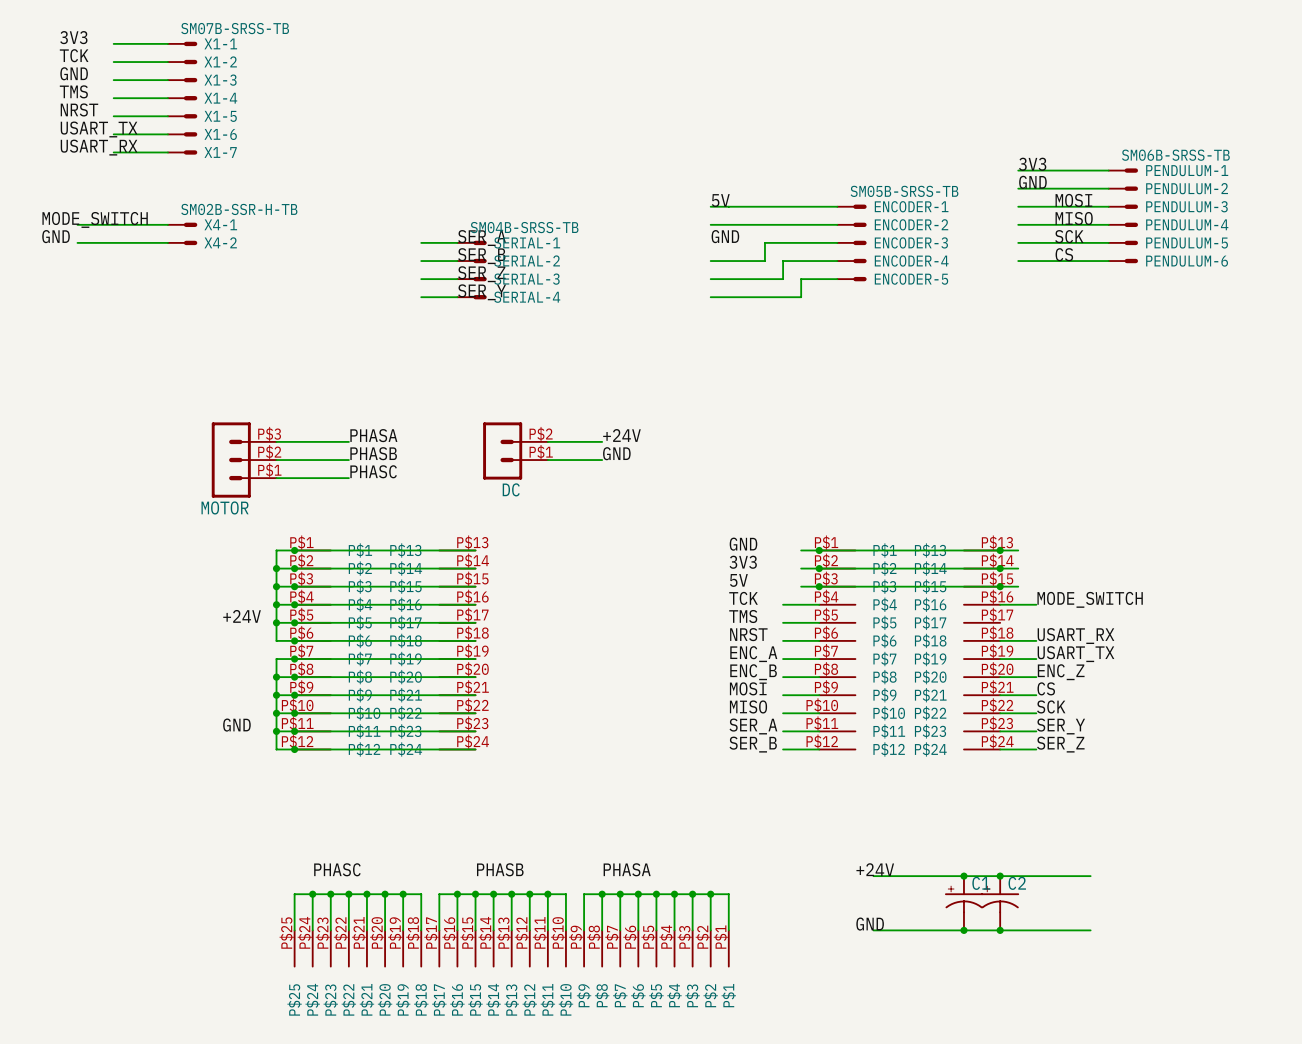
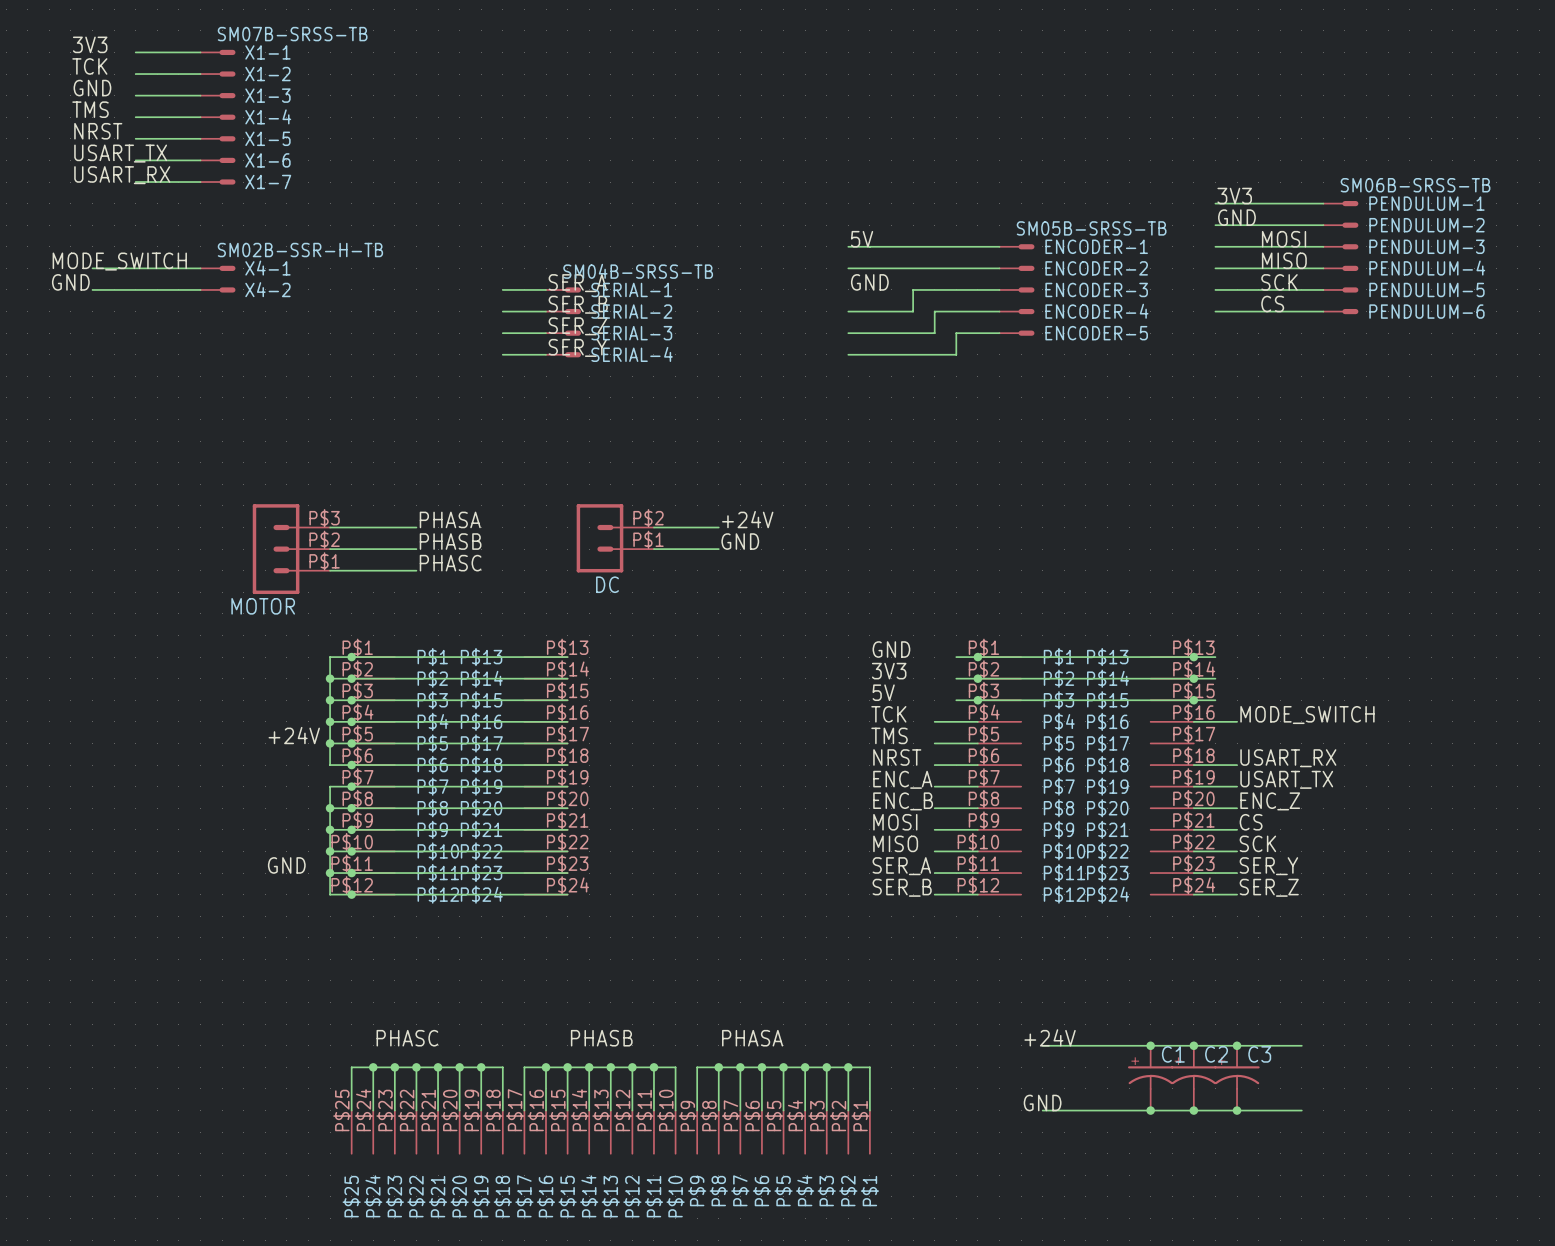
junction: none -> (1237, 1045)
C3: none -> (1237, 1078)
junction: none -> (1237, 1110)

